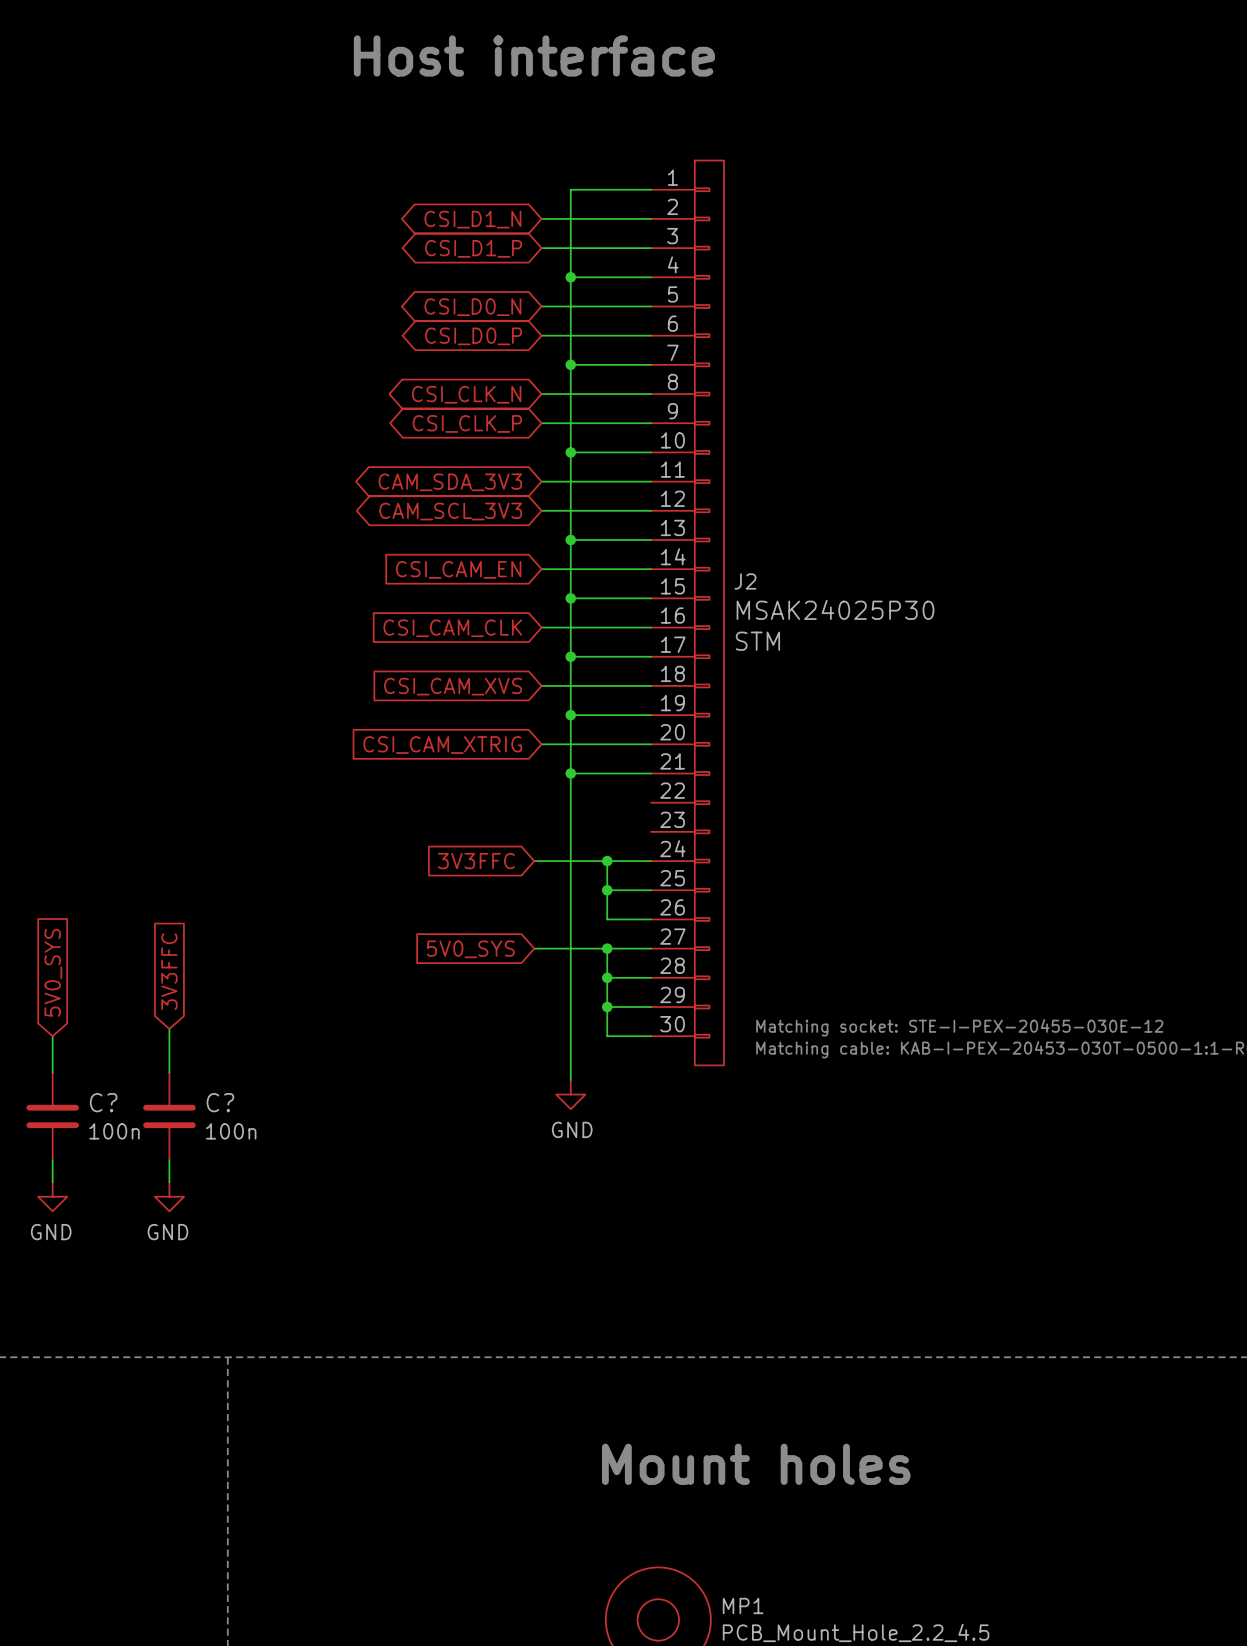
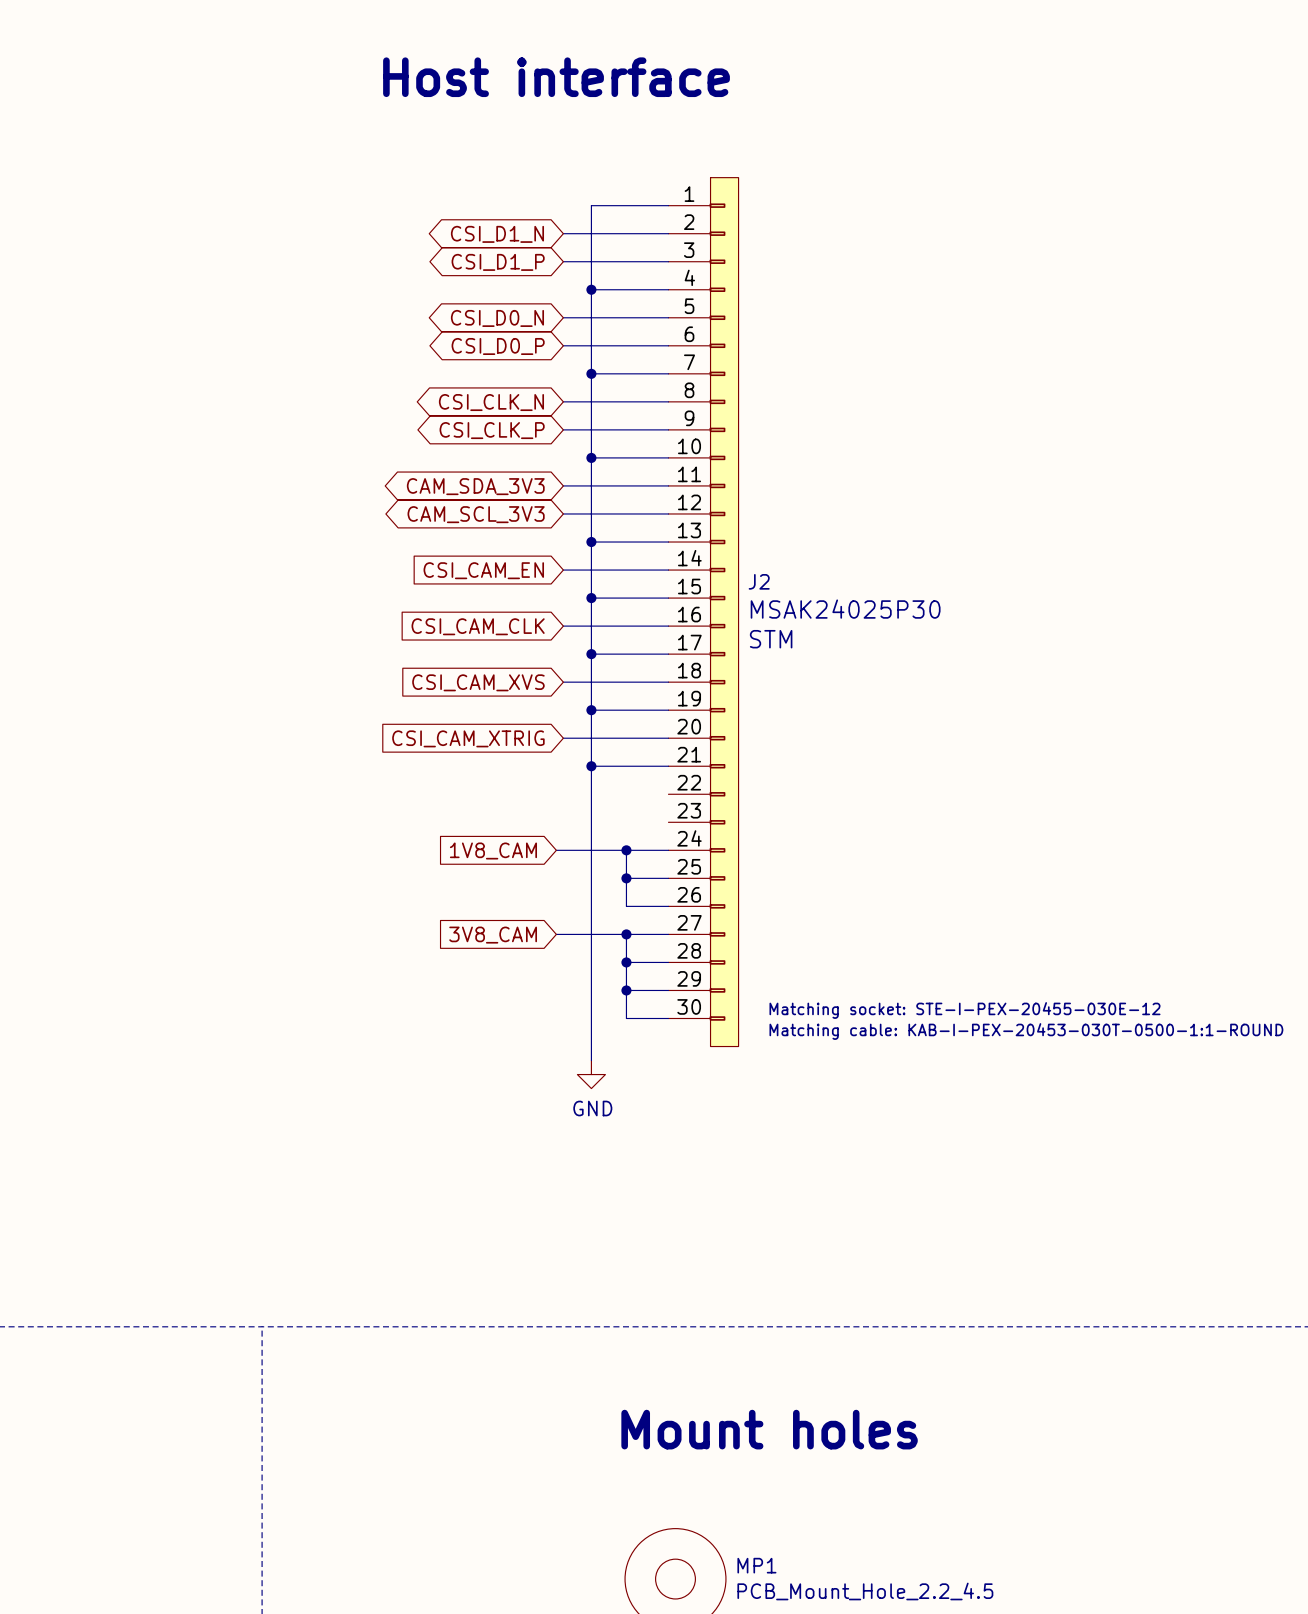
global label: 3V3FFC (476, 861) -> 1V8_CAM (493, 850)
global label: 5V0_SYS (470, 949) -> 3V8_CAM (493, 935)
global label: 3V3FFC (169, 971) -> none
global label: 5V0_SYS (53, 972) -> none
wire: (169, 1028) (169, 1072) -> none
wire: (52, 1036) (52, 1072) -> none
C?: (52, 1116) -> none
C?: (169, 1116) -> none
wire: (52, 1160) (52, 1182) -> none
wire: (169, 1160) (169, 1182) -> none
power symbol: GND (52, 1196) -> none
power symbol: GND (169, 1196) -> none

